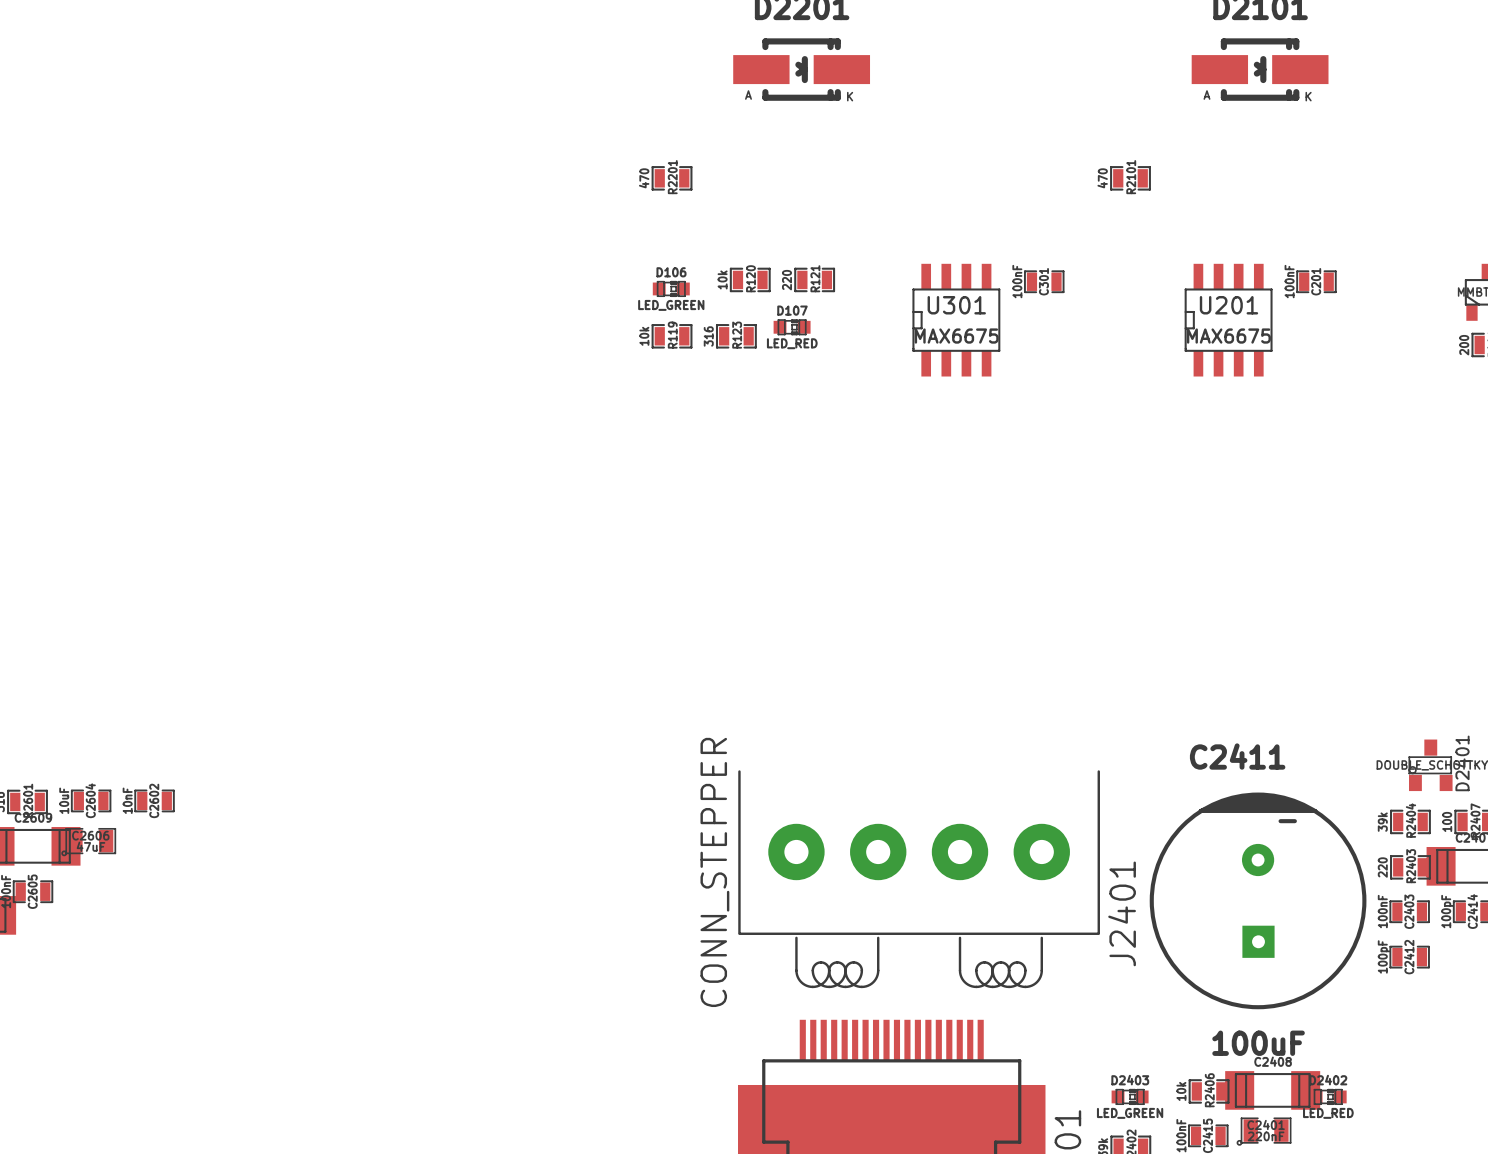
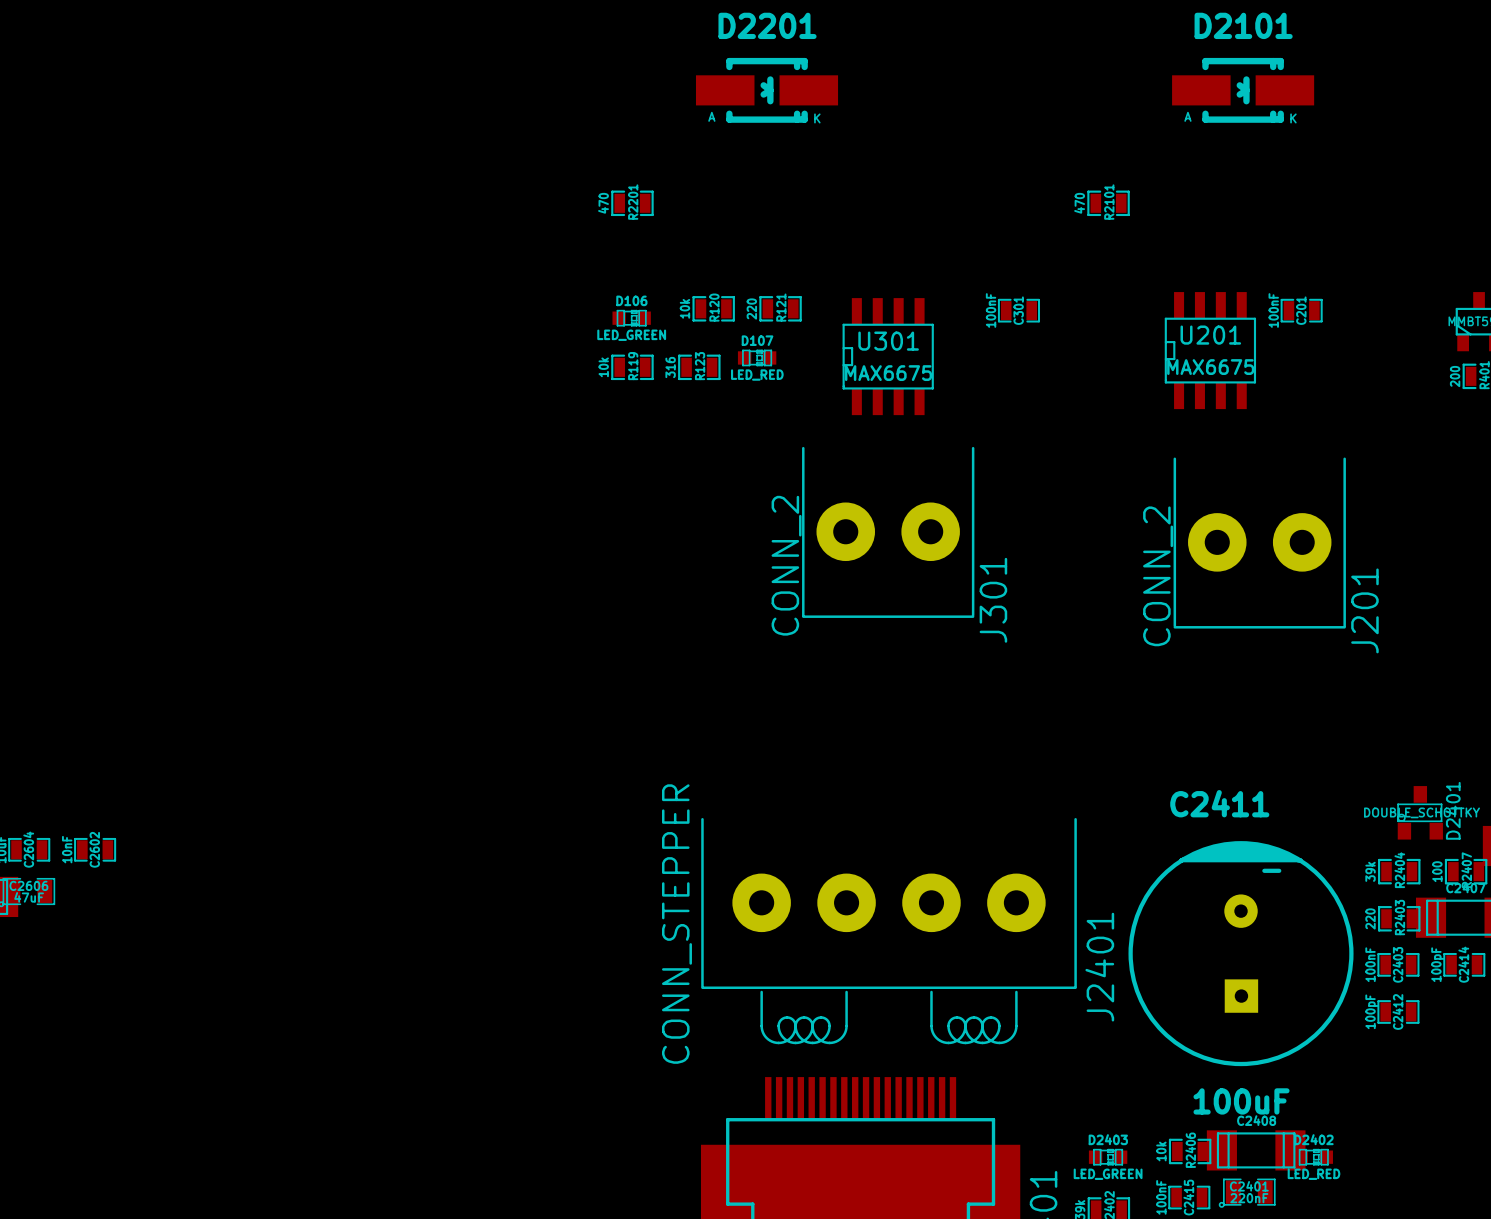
U301 position: (956, 320) -> (888, 356)
J301: none -> CONN_2 (888, 532)
J201: none -> CONN_2 (1259, 543)

